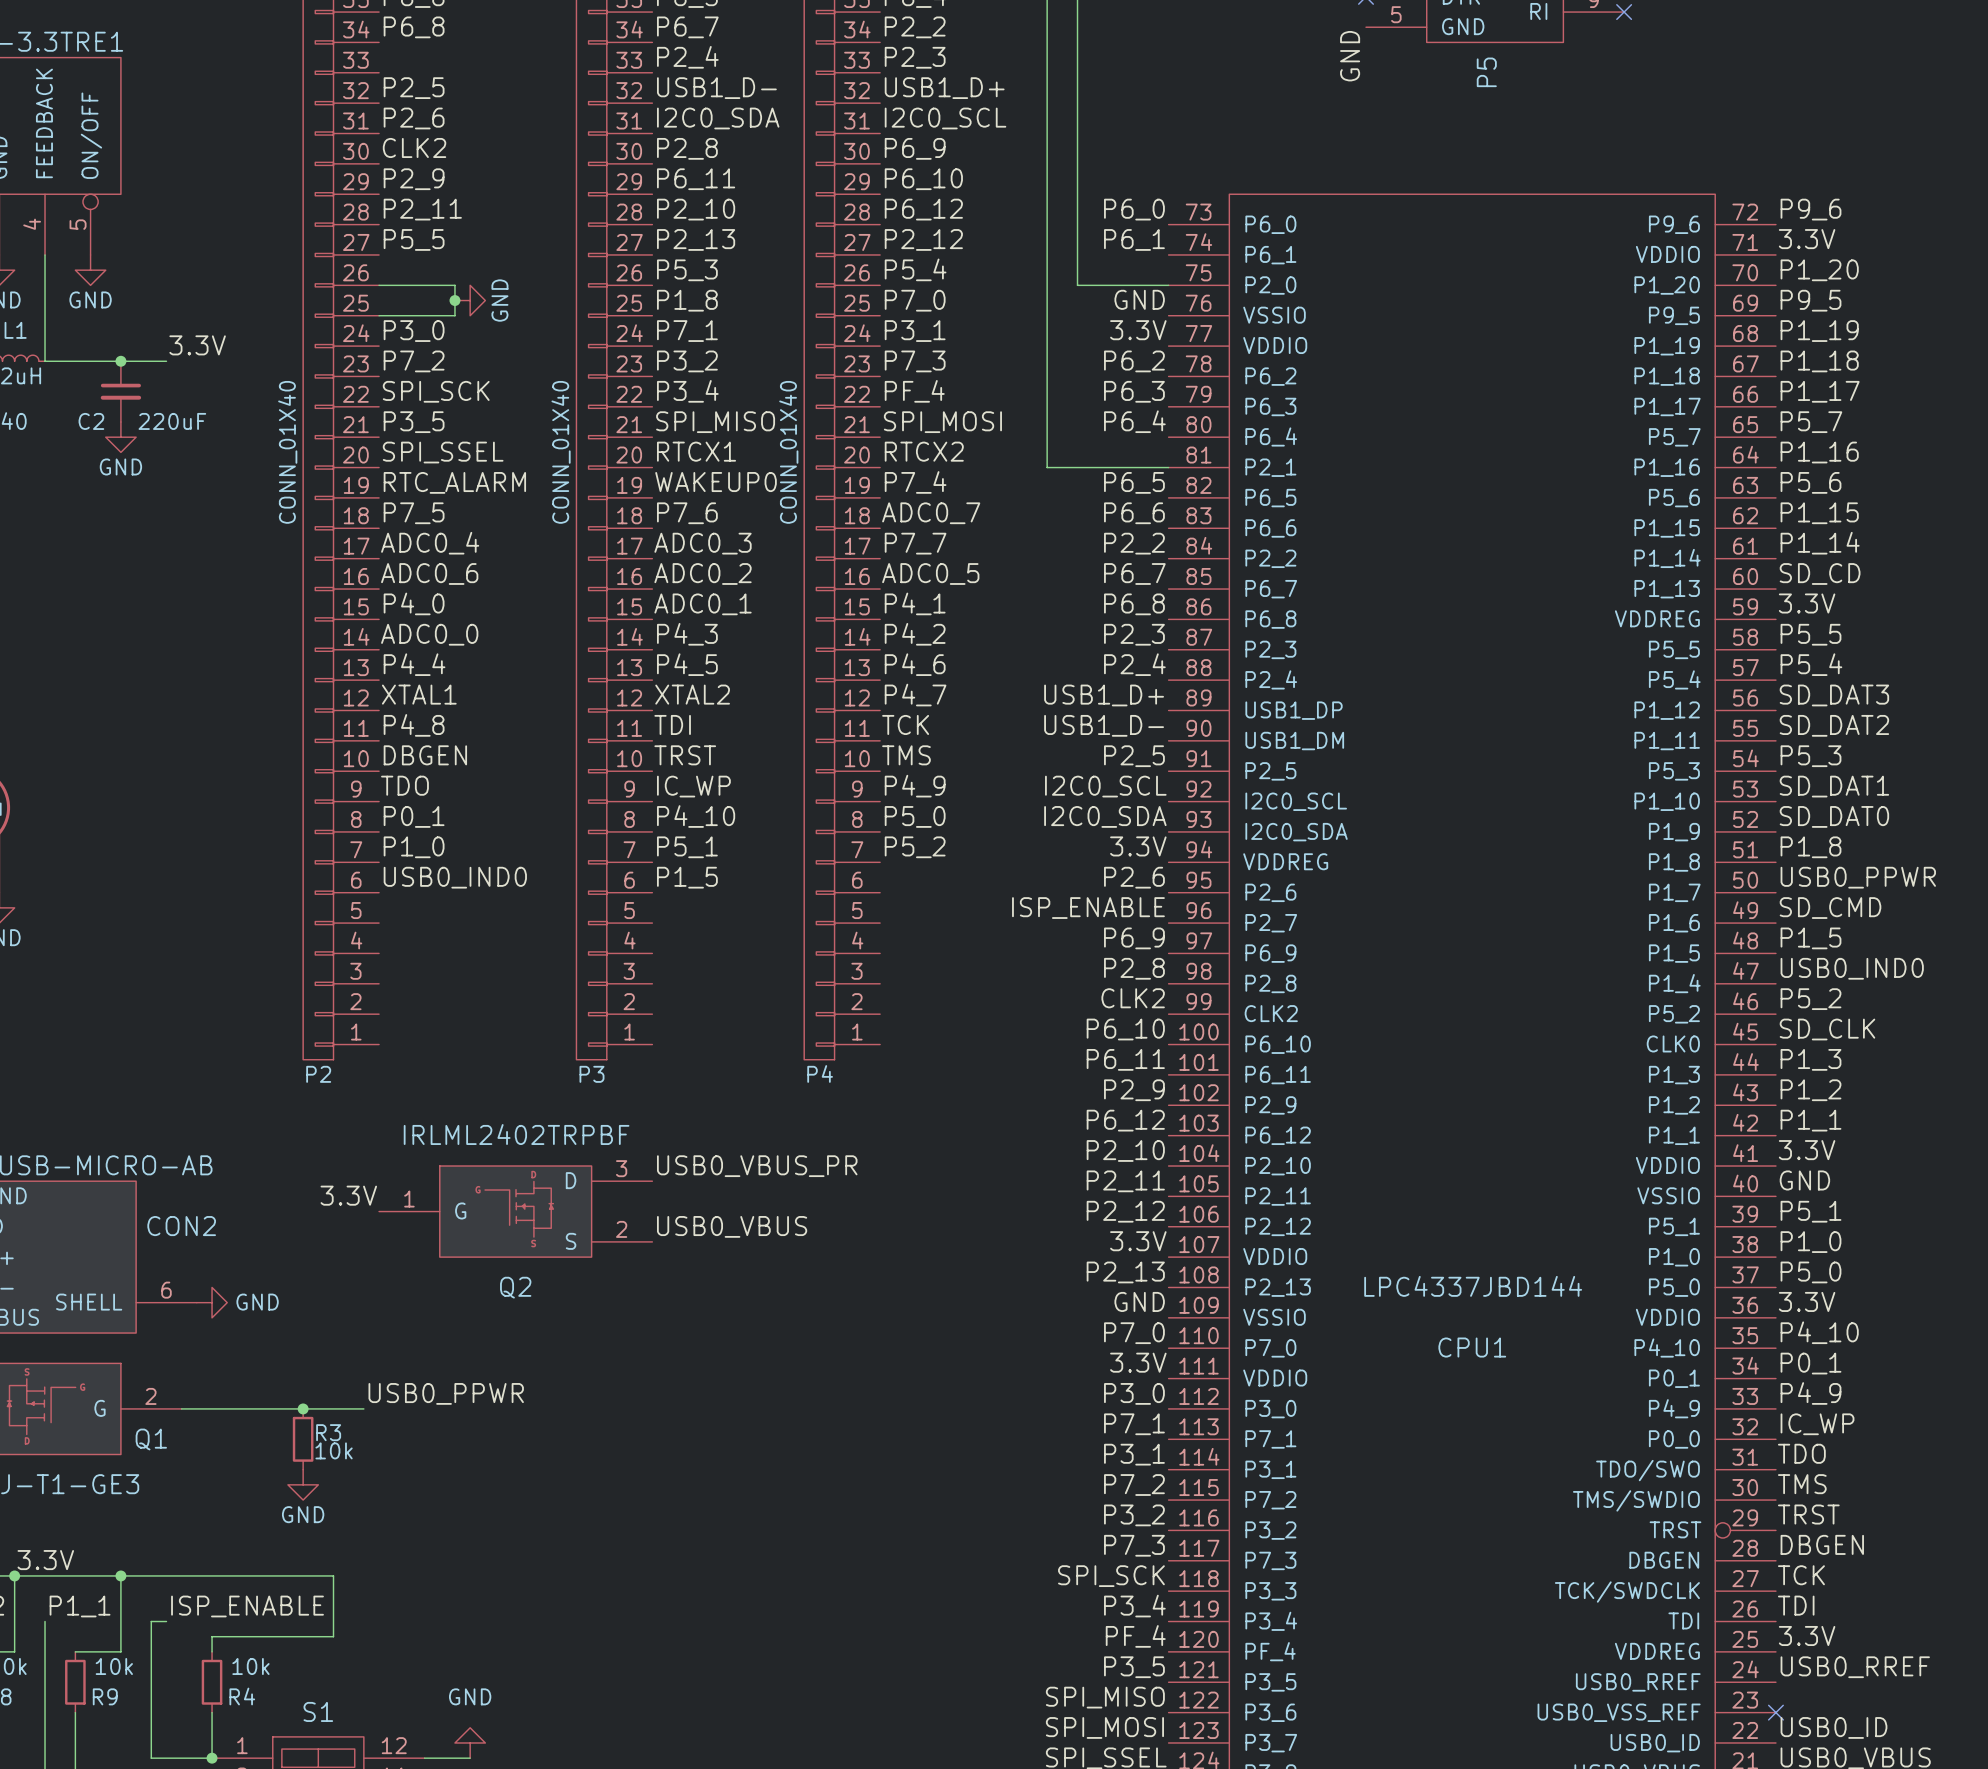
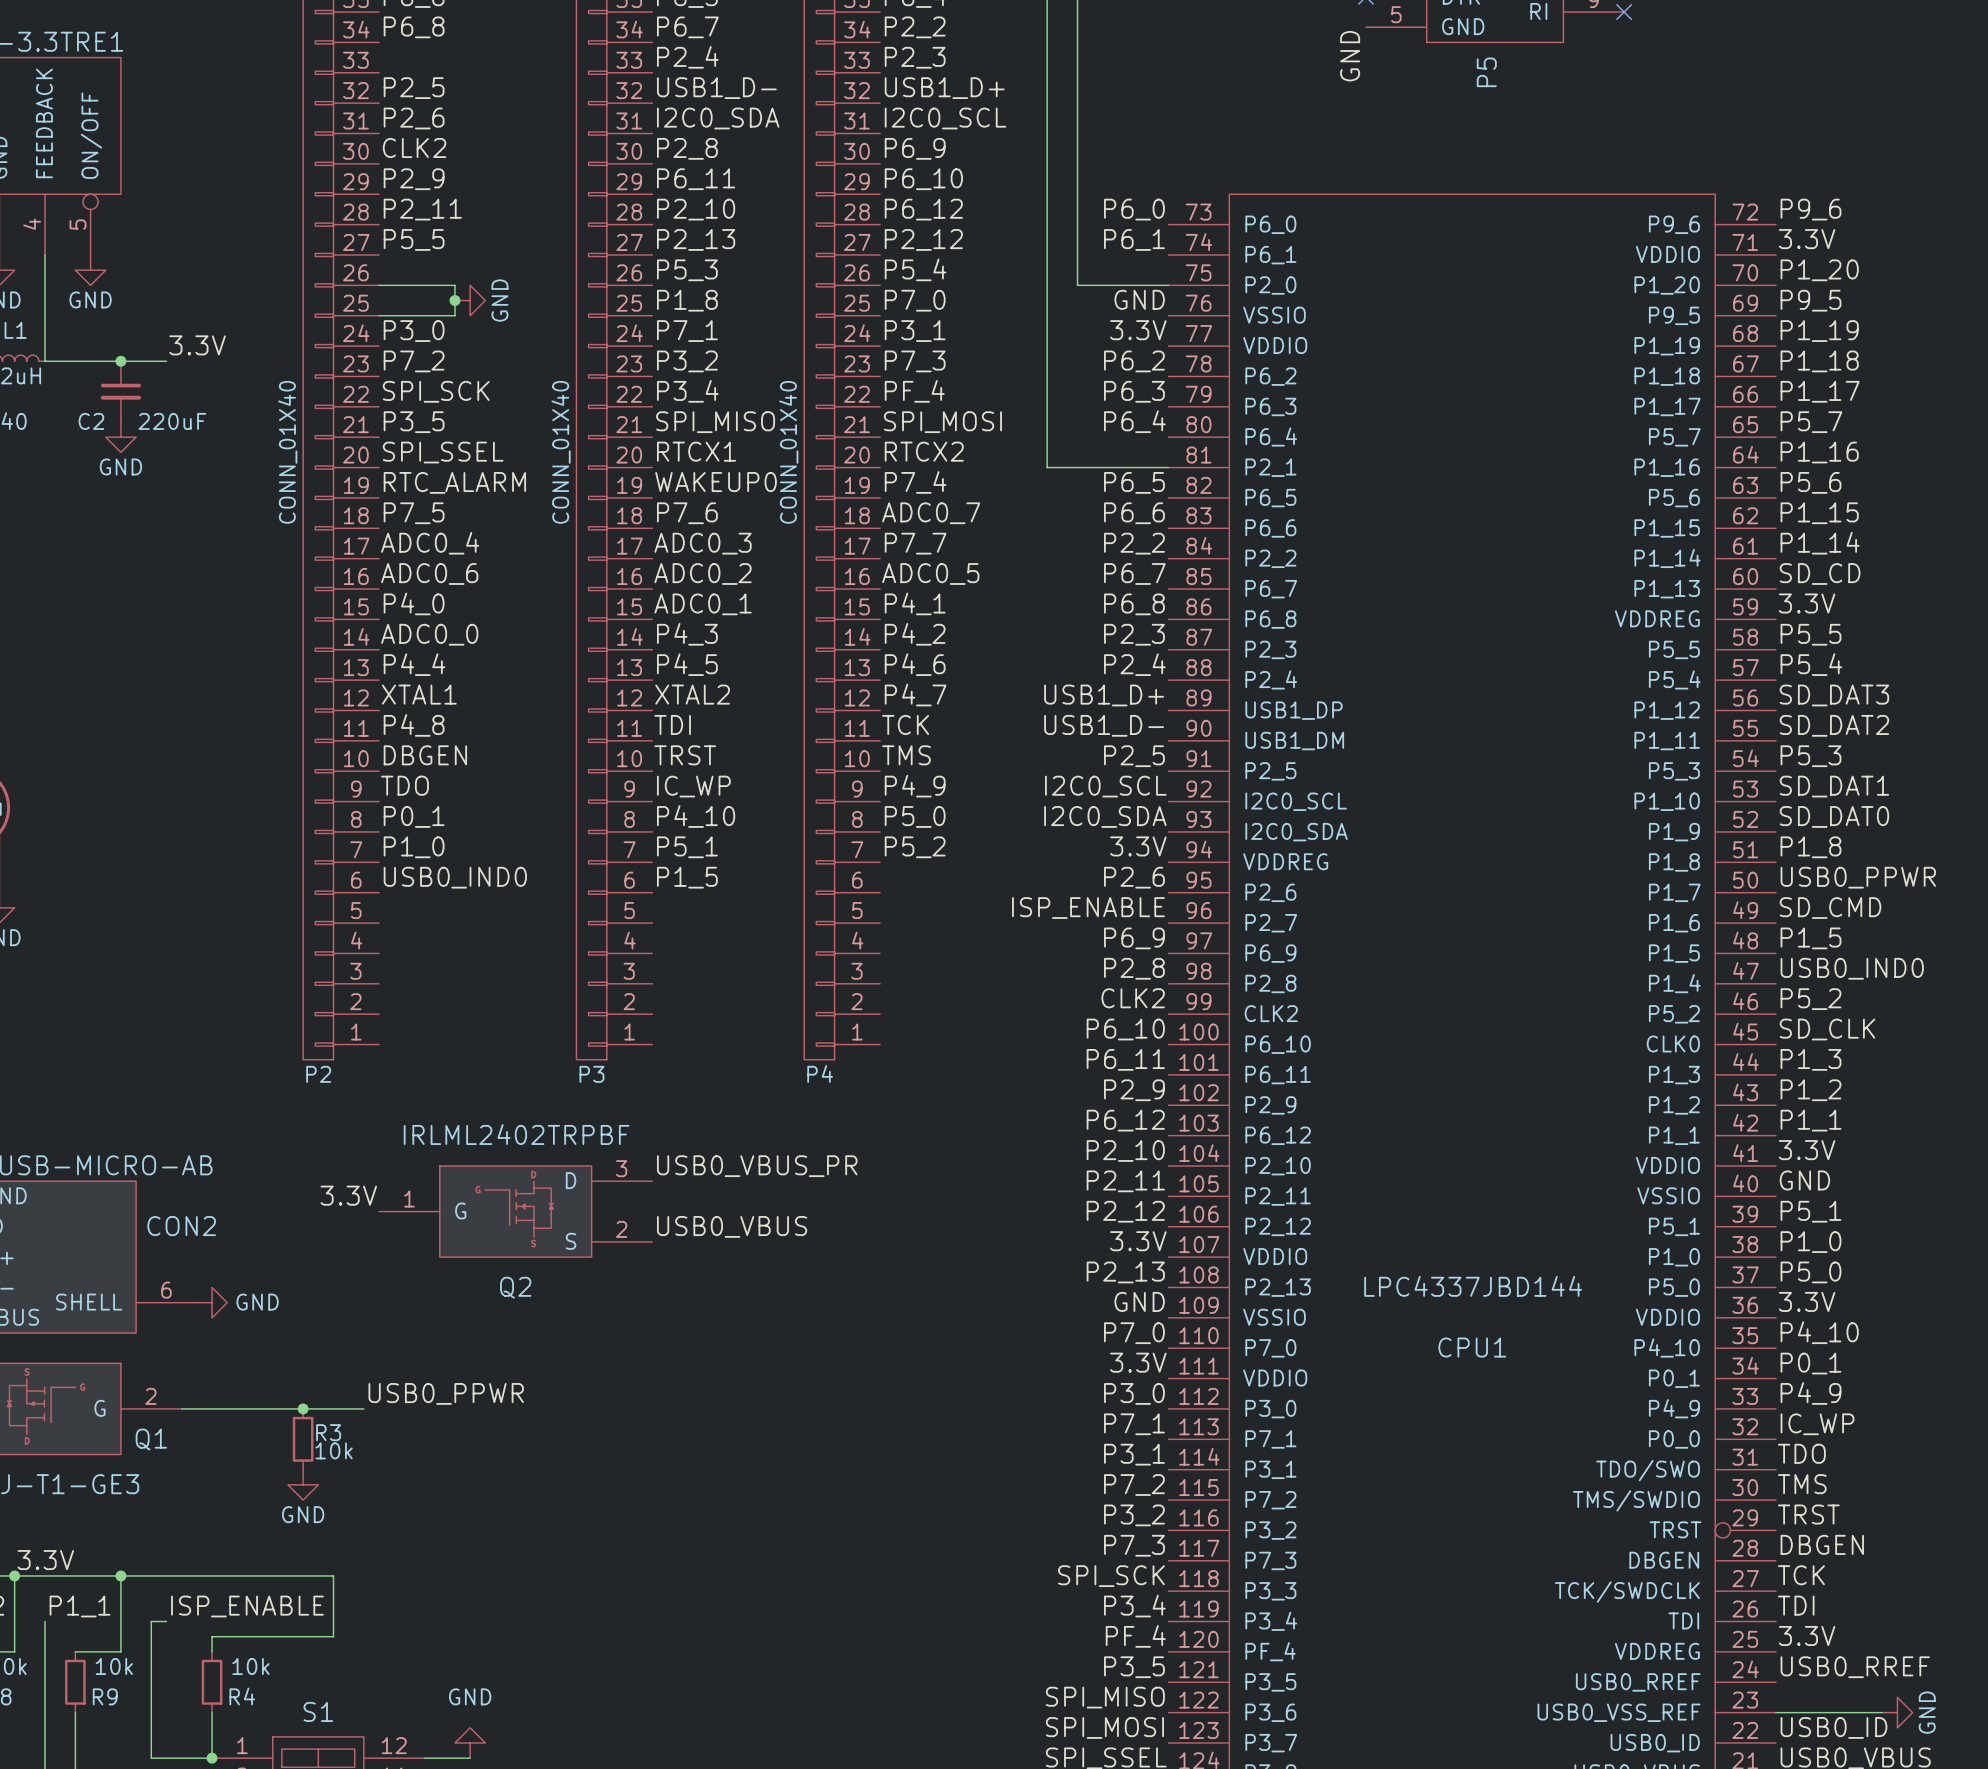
wire: none -> (1775, 1712) (1882, 1712)
no-connect mark: (1775, 1712) -> none
power symbol: none -> GND (1897, 1712)

